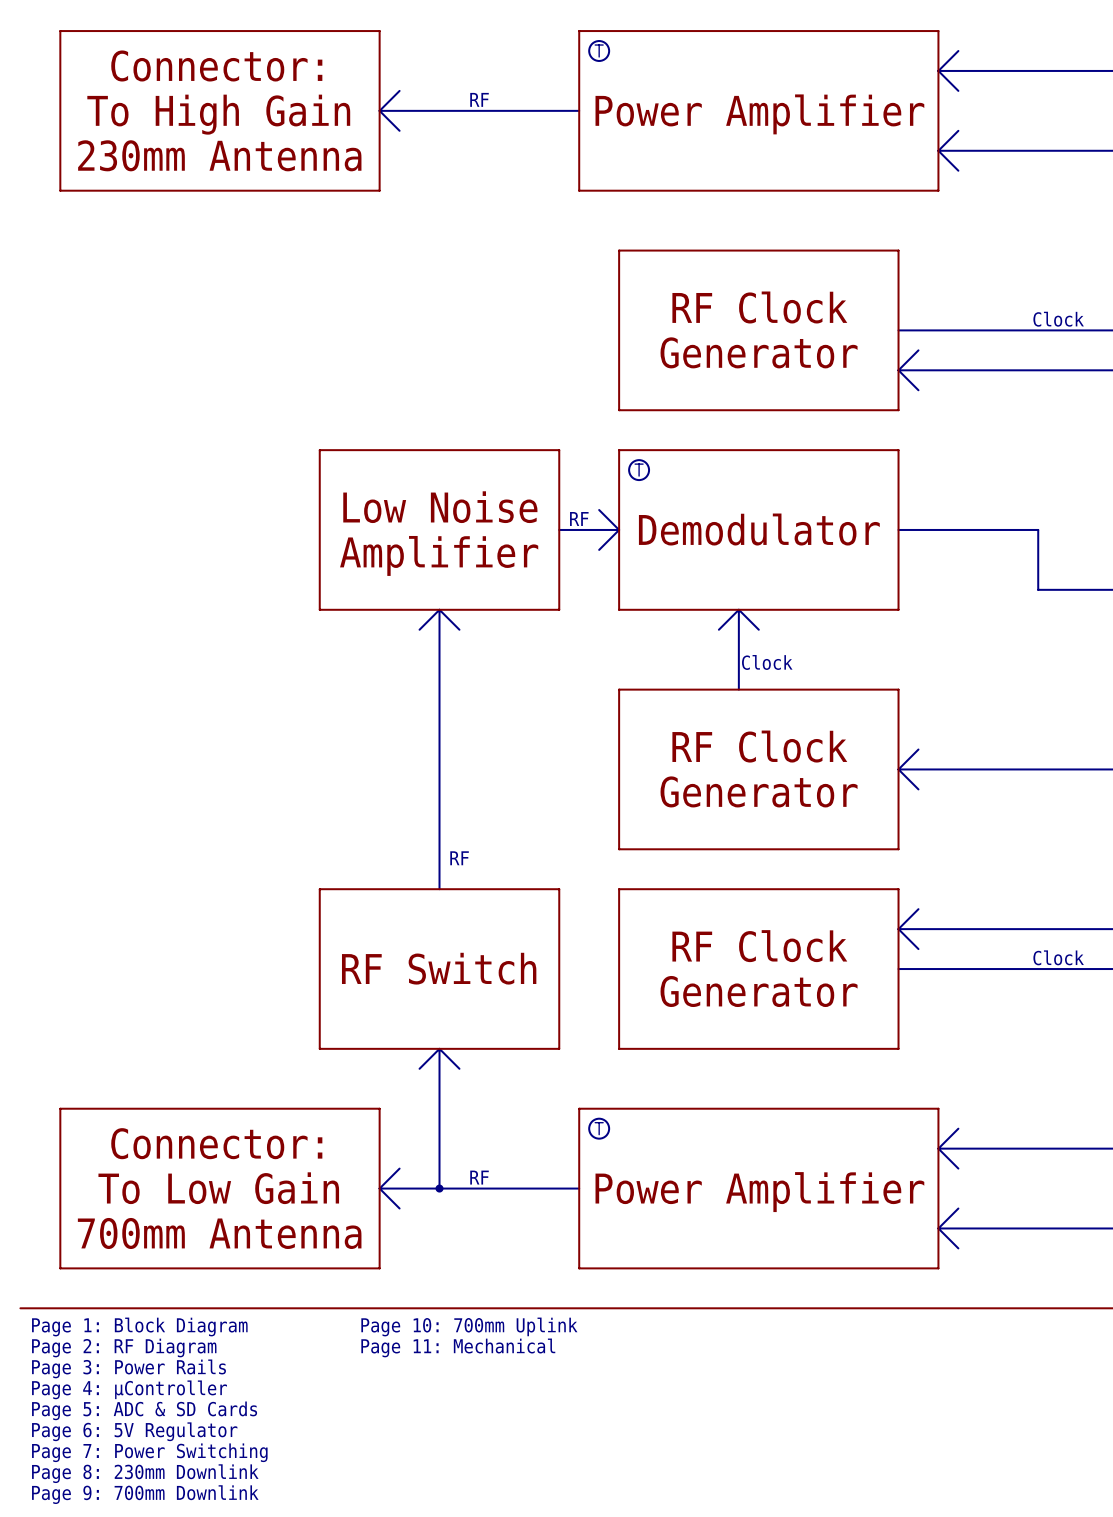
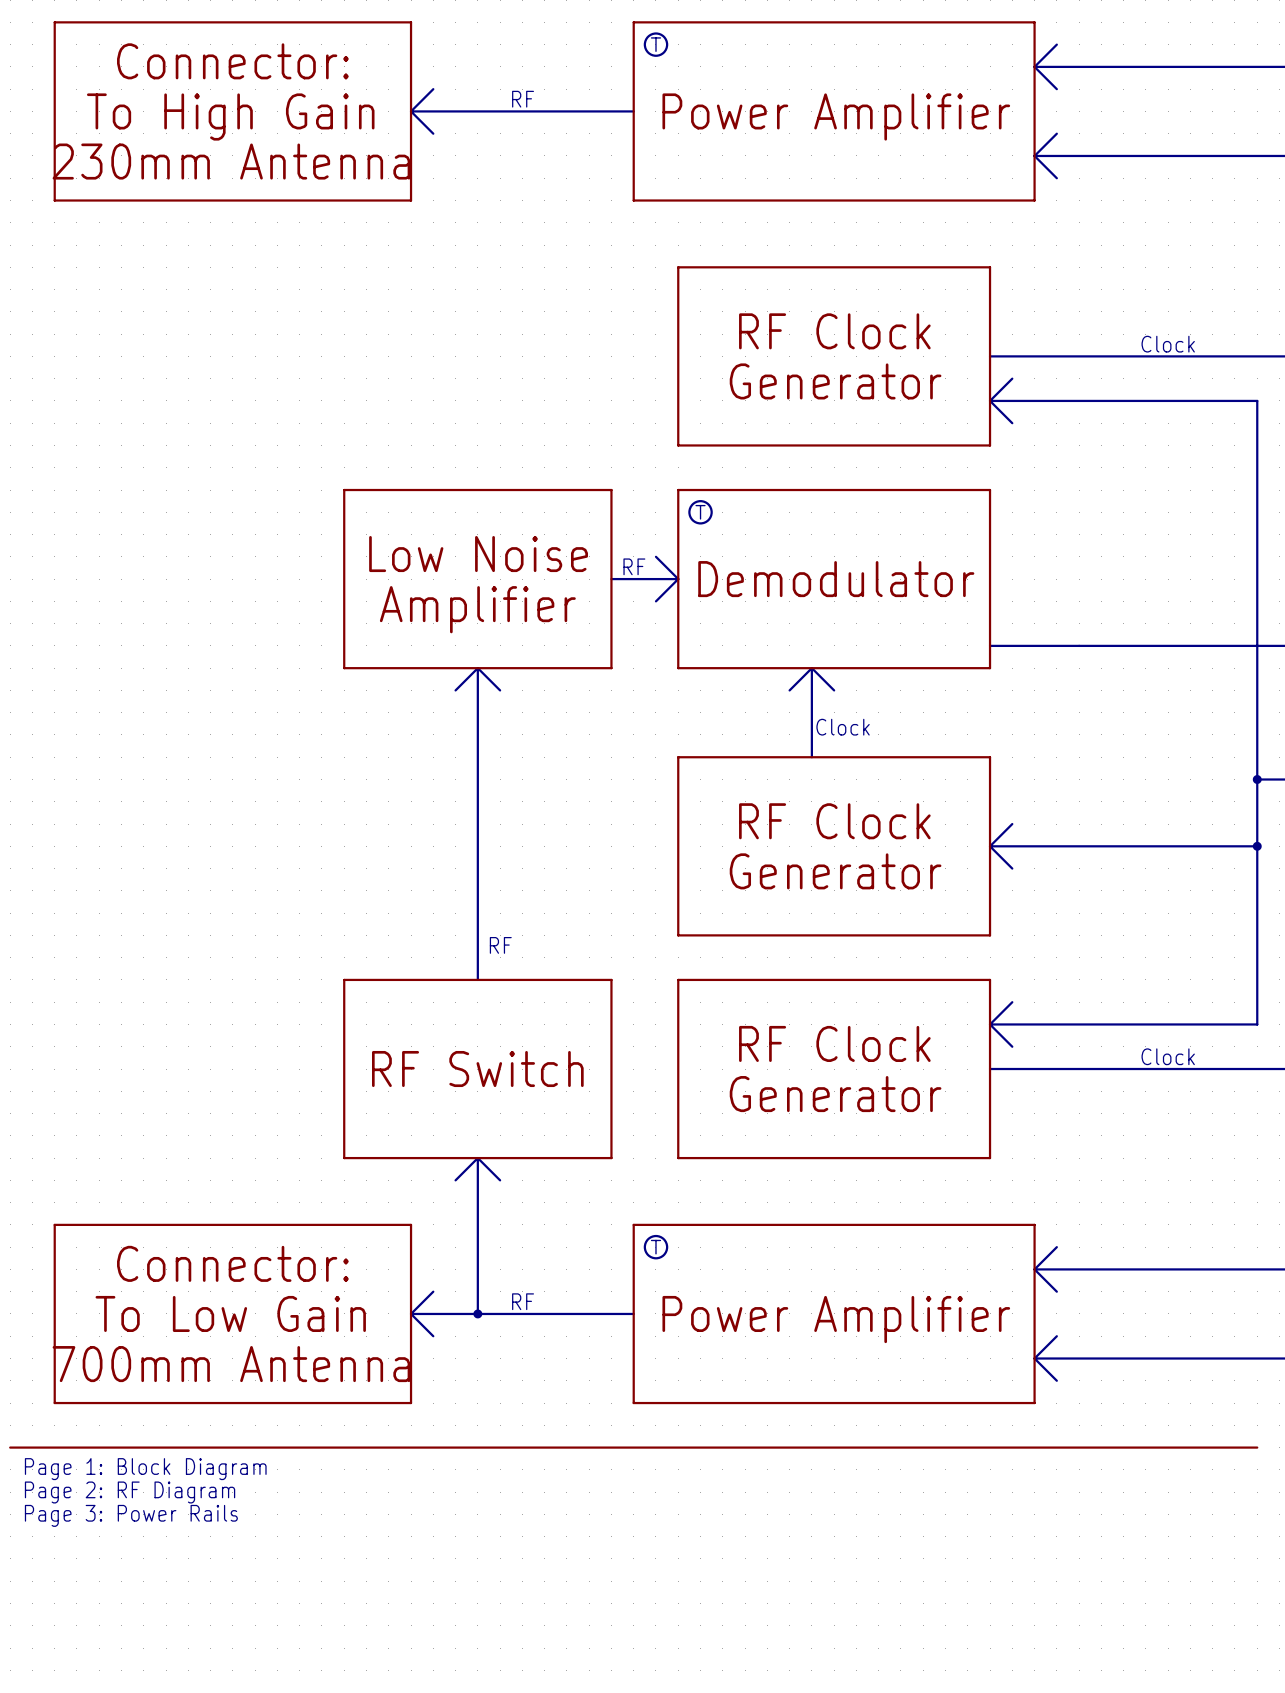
line: (898, 529) (1038, 529) (1038, 589) -> (990, 645) (1145, 645)
text: Page 10: 700mm Uplink (469, 1326) -> none
text: Page 11: Mechanical (458, 1347) -> none
text: Page 4: µController (129, 1389) -> none
text: Page 5: ADC & SD Cards (144, 1410) -> none
text: Page 6: 5V Regulator (134, 1431) -> none
text: Page 7: Power Switching (149, 1452) -> none
text: Page 8: 230mm Downlink (145, 1473) -> none
text: Page 9: 700mm Downlink (145, 1494) -> none

